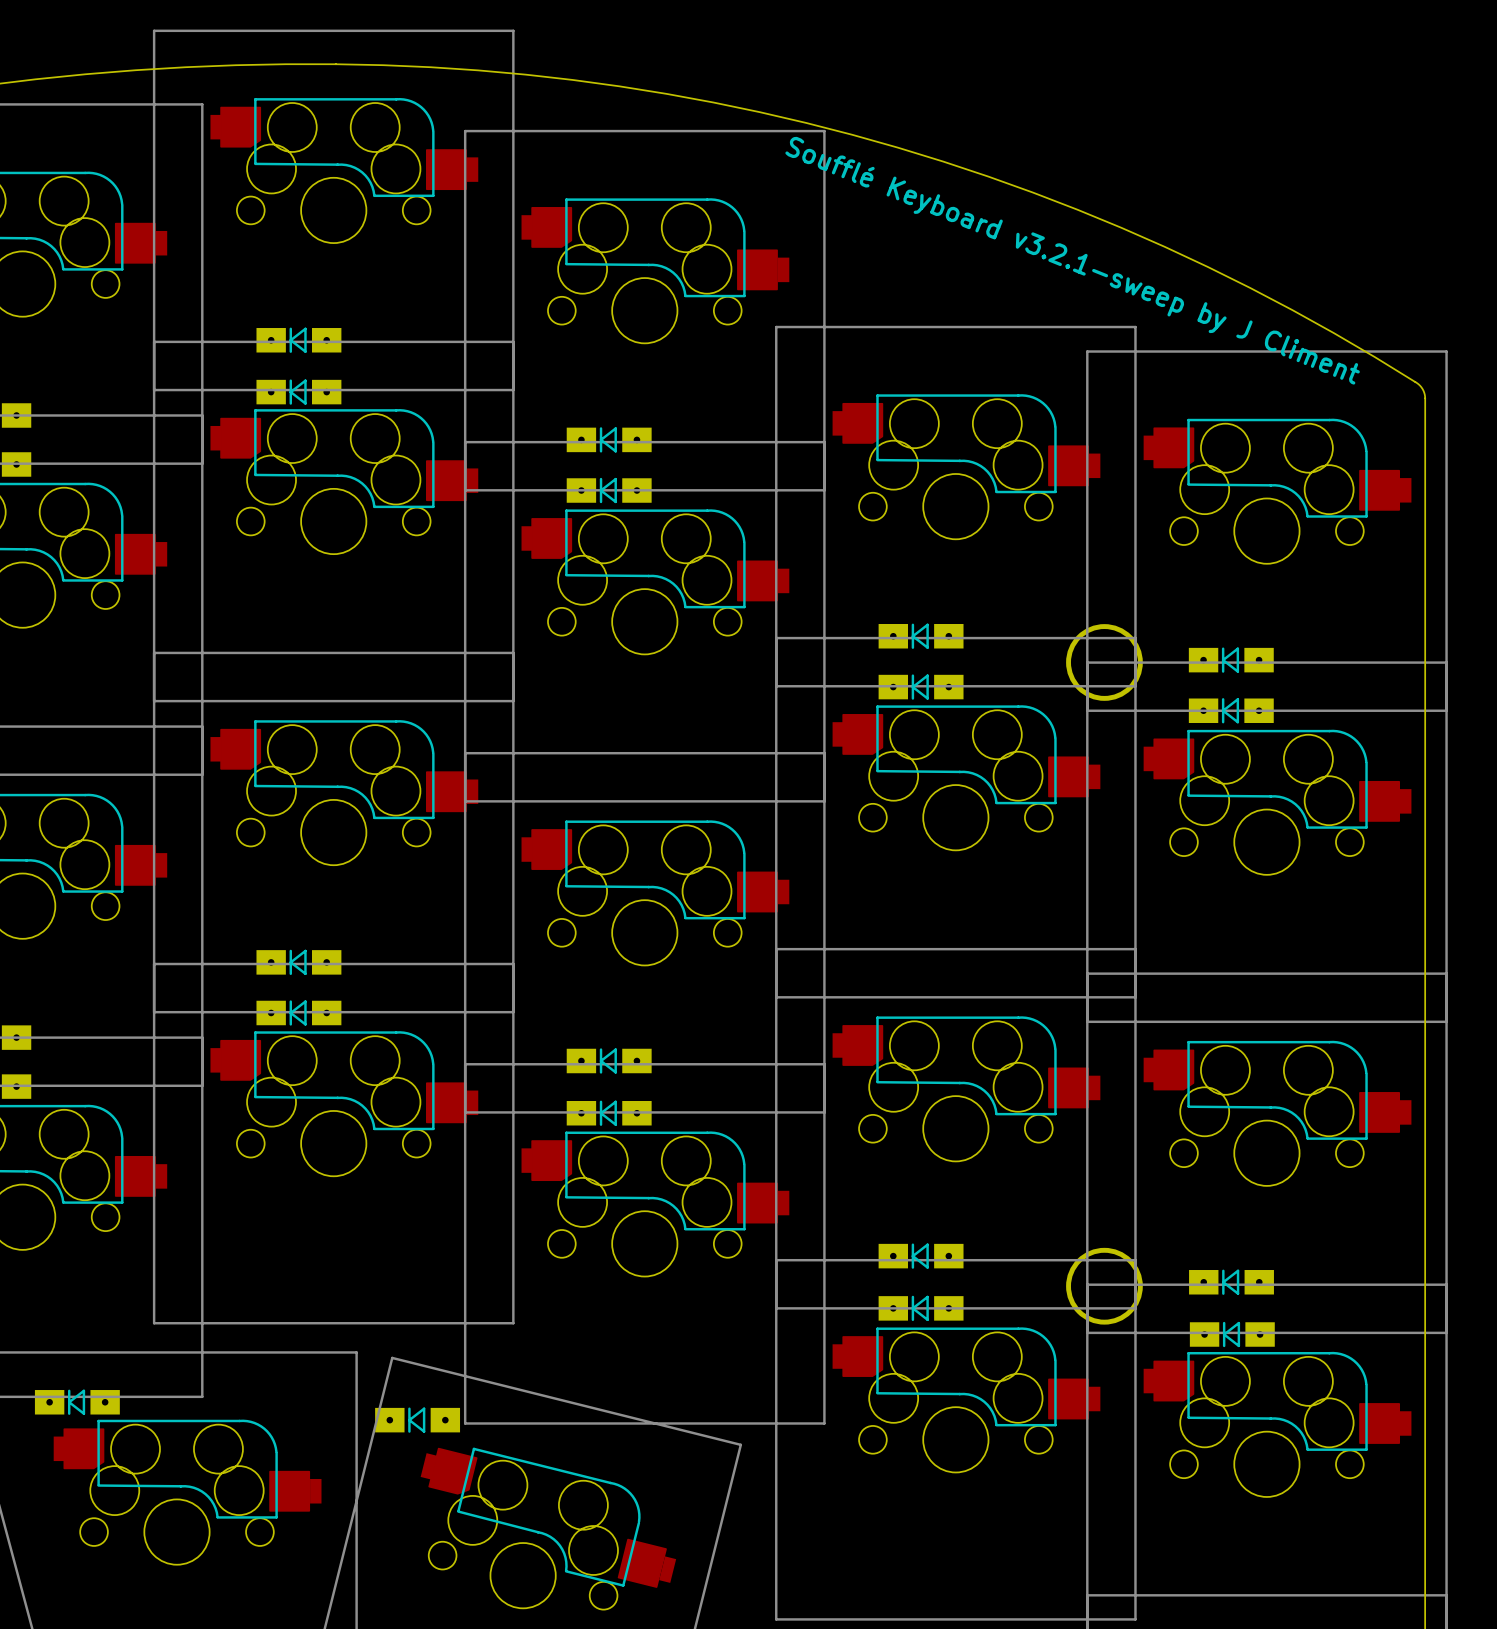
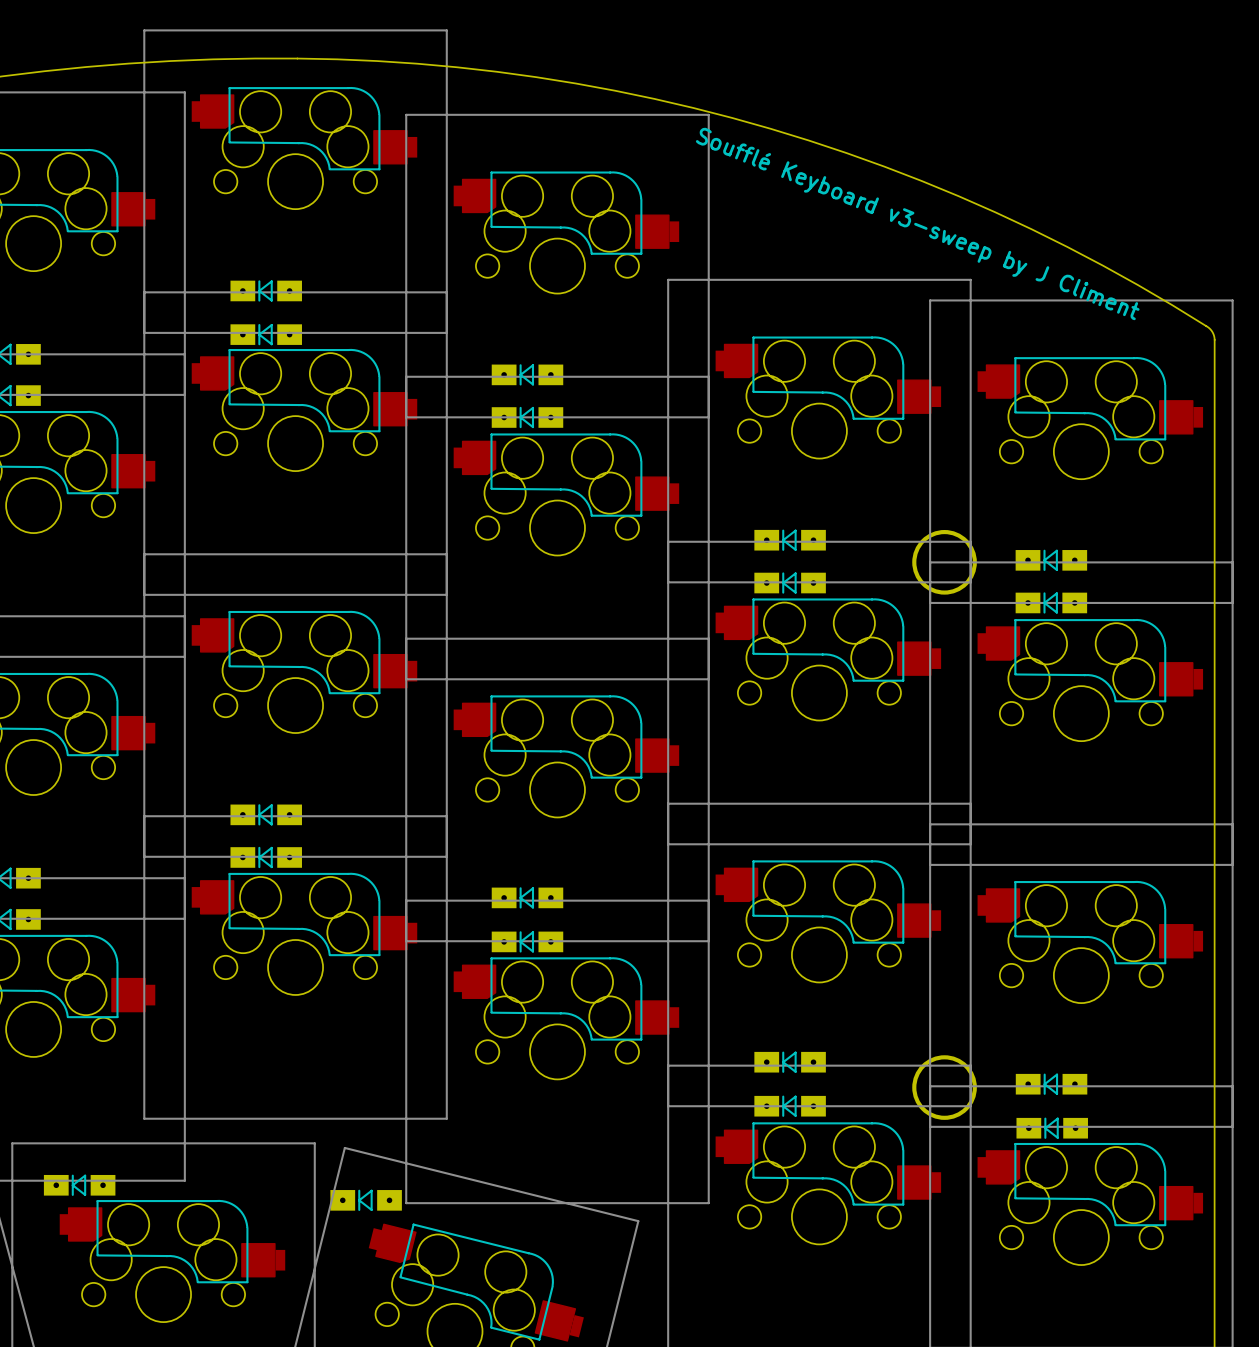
text: Soufflé Keyboard v3.2.1-sweep by J Climent (1072, 260) -> Soufflé Keyboard v3-sweep by J Climent (917, 223)

